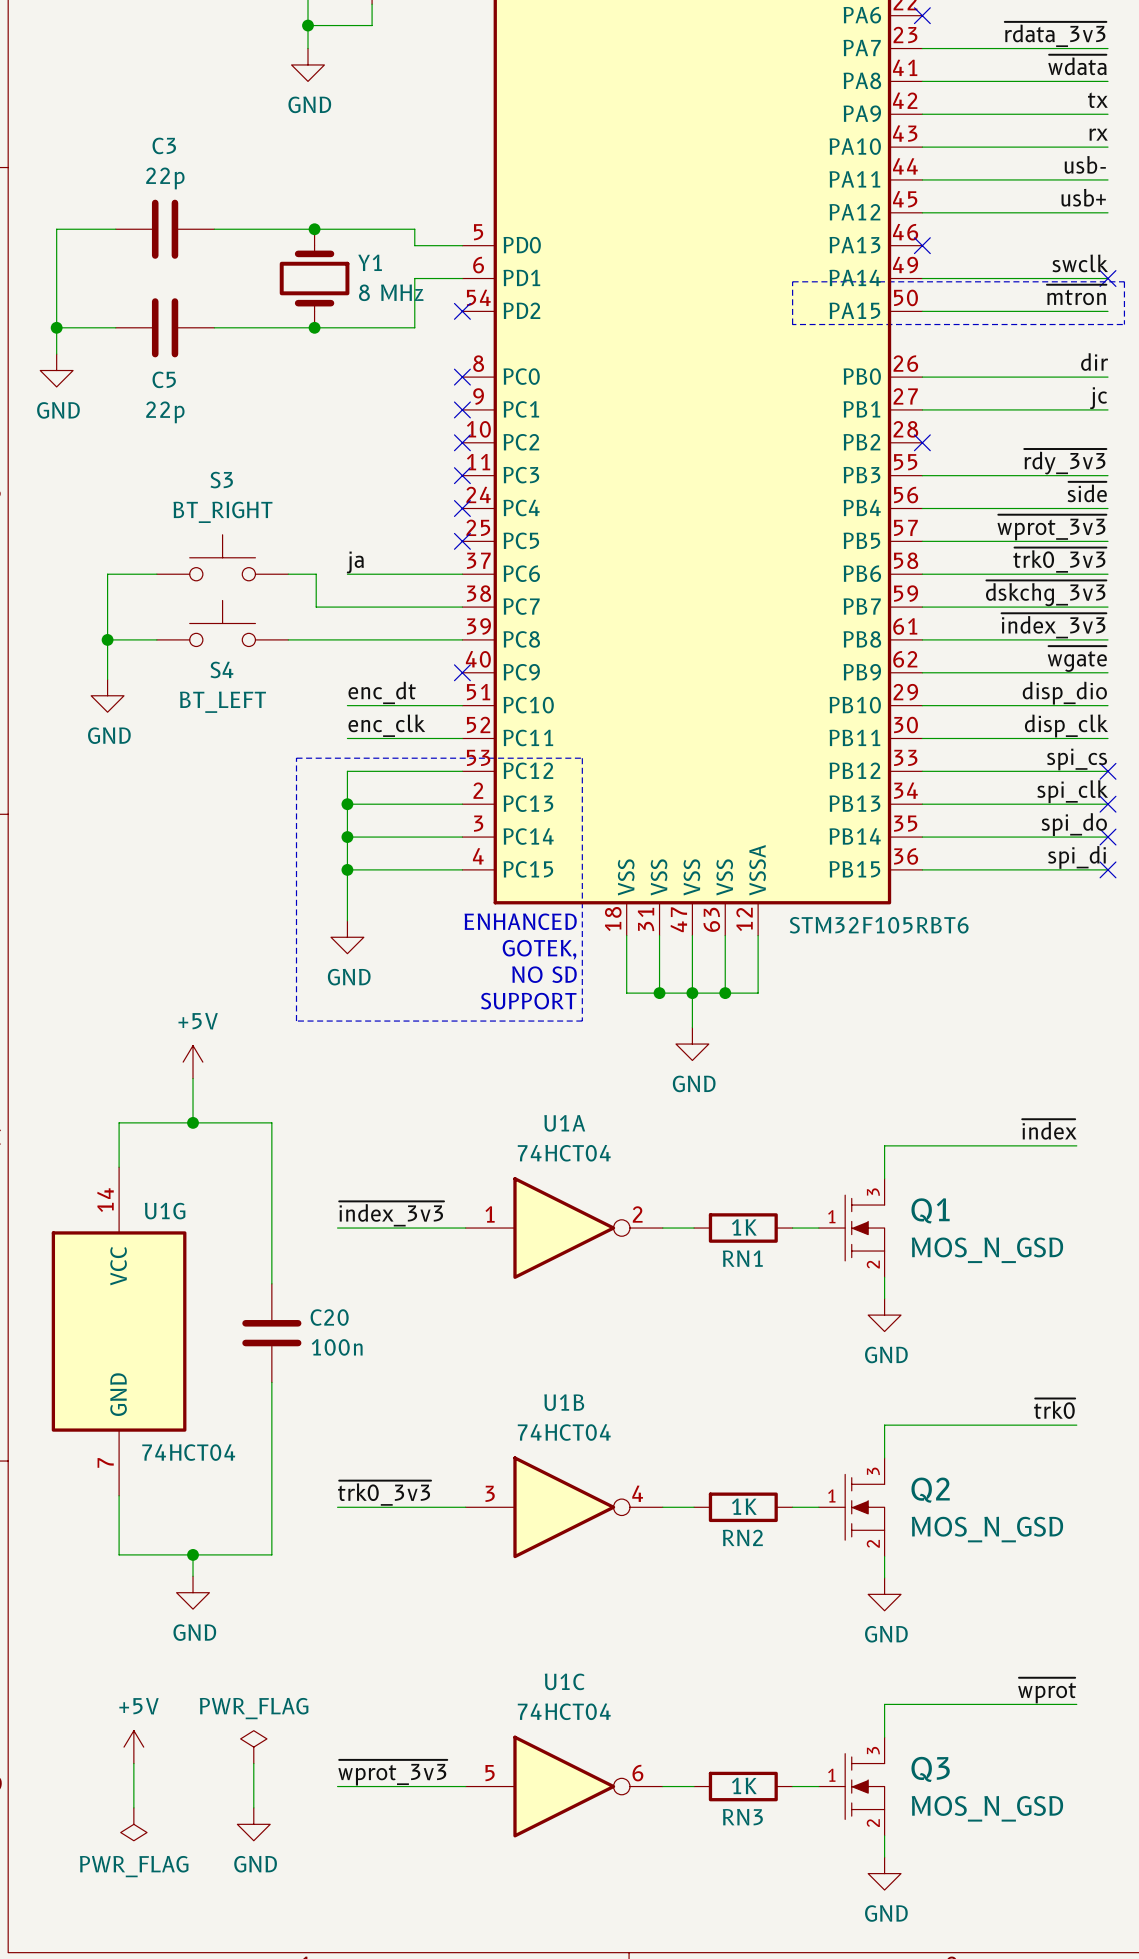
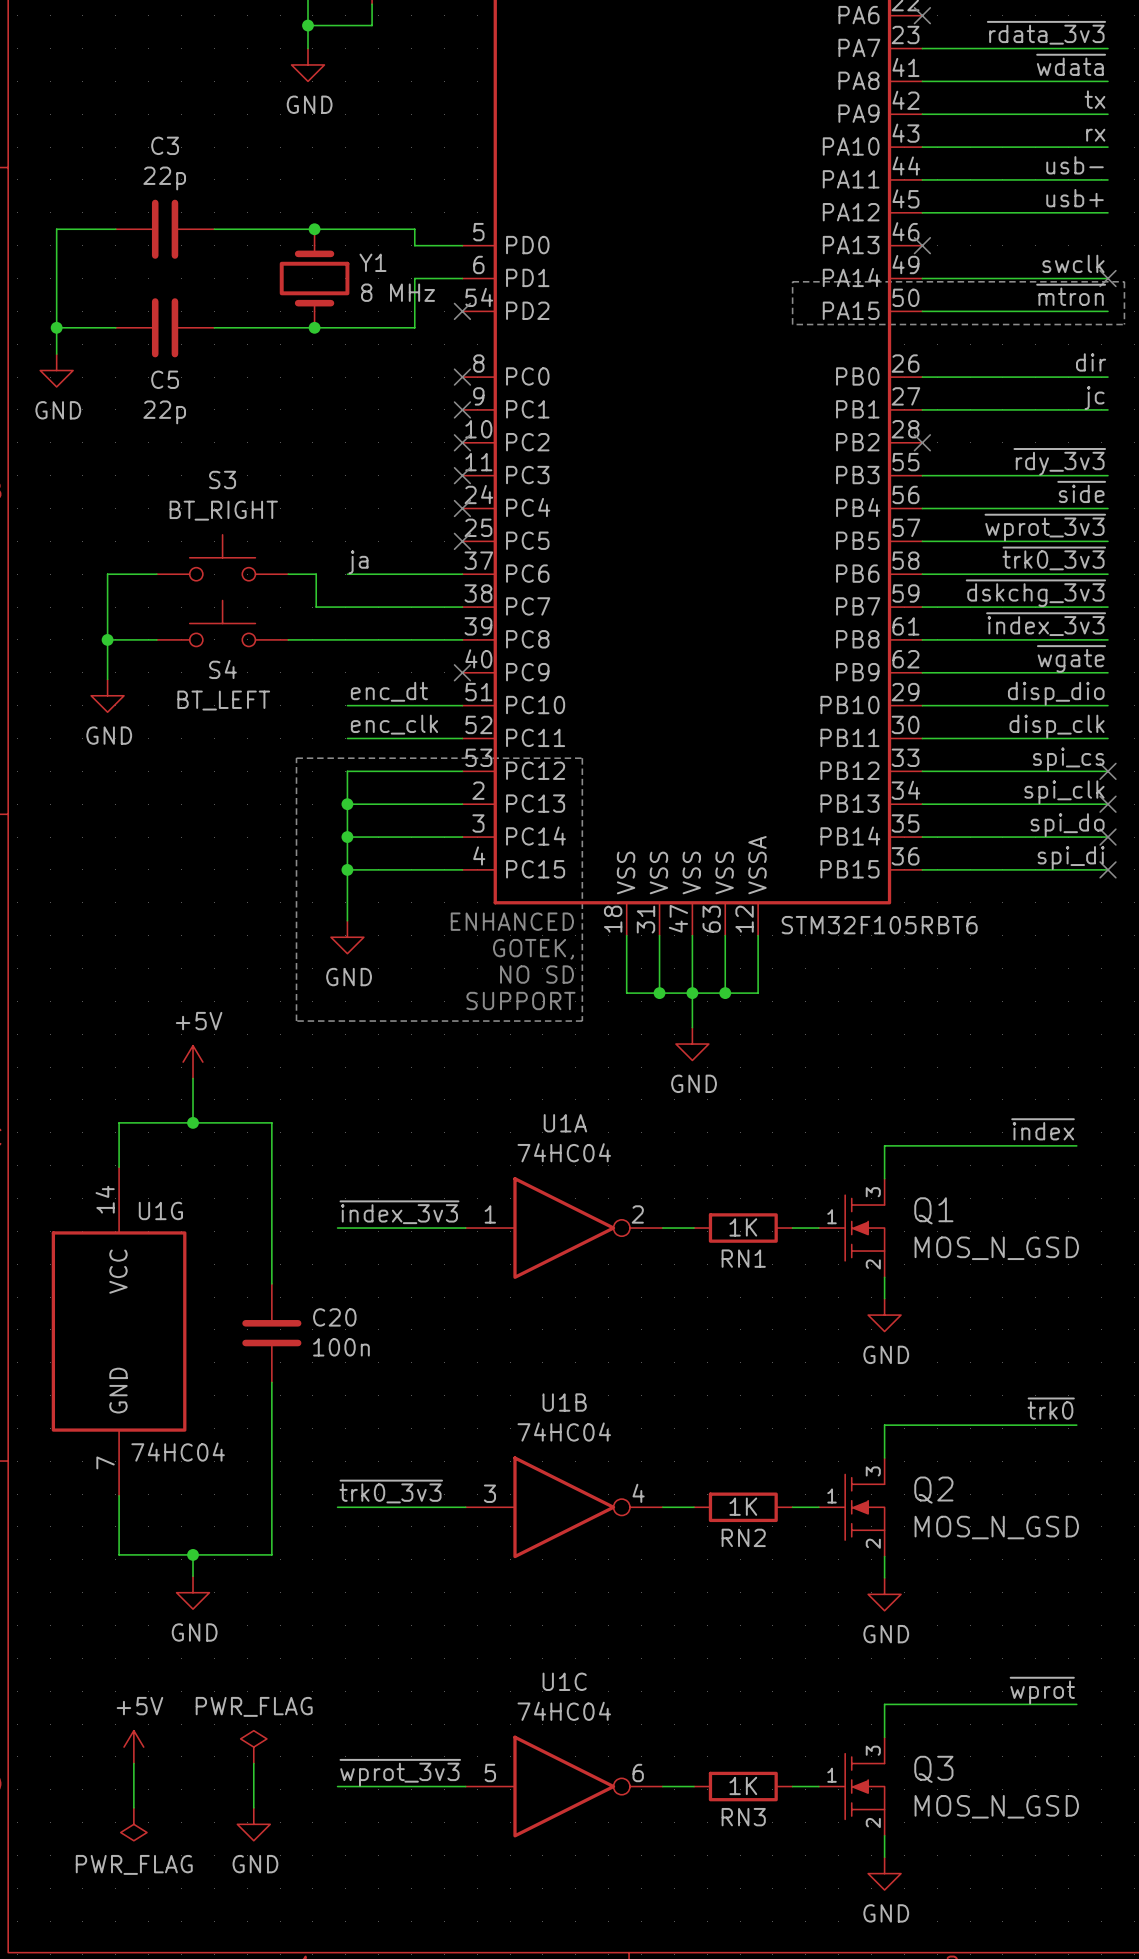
U1A value: 74HCT04 (564, 1153) -> 74HC04 (564, 1152)
U1B value: 74HCT04 (564, 1432) -> 74HC04 (564, 1432)
U1G value: 74HCT04 (188, 1452) -> 74HC04 (178, 1452)
U1C value: 74HCT04 (564, 1711) -> 74HC04 (564, 1711)

